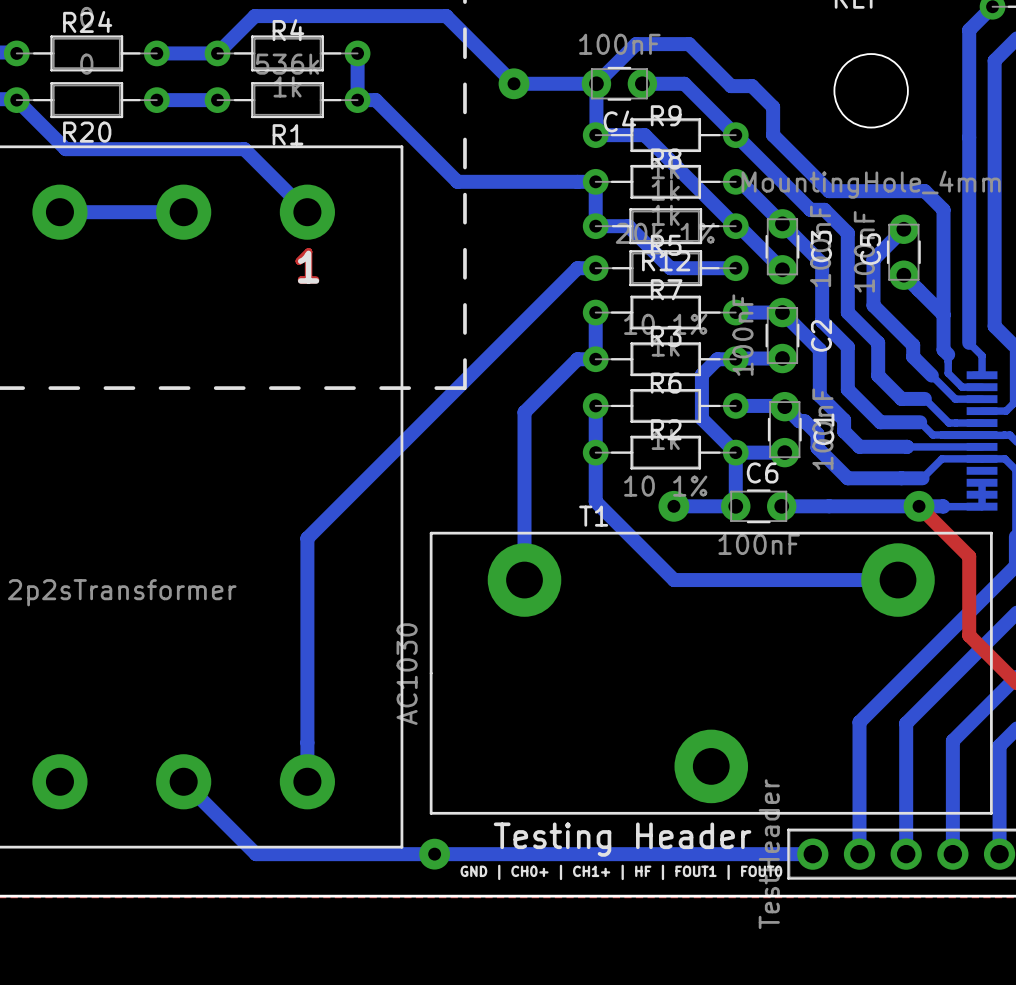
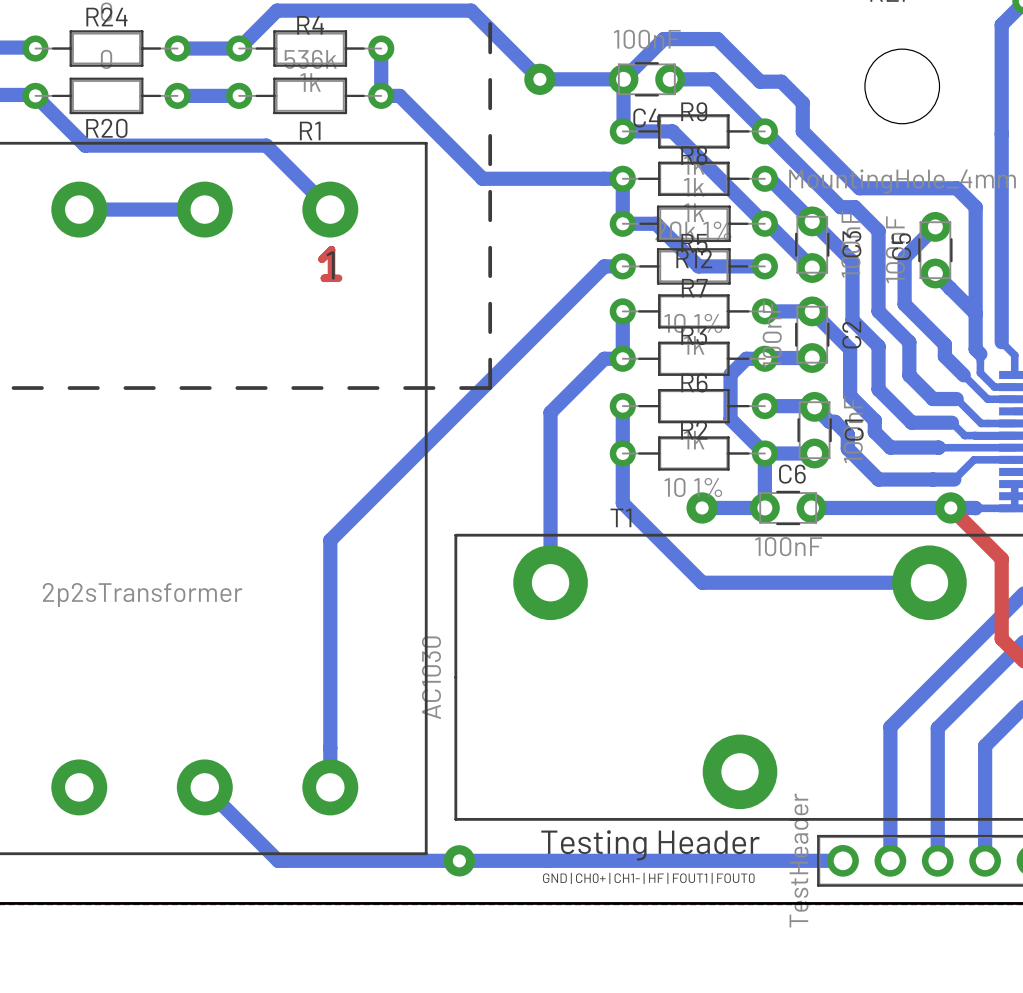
text: GND | CH0+ | CH1+ | HF | FOUT1 | FOUT0 (621, 872) -> GND | CH0+ | CH1- | HF | FOUT1 | FOUT0 (648, 878)

